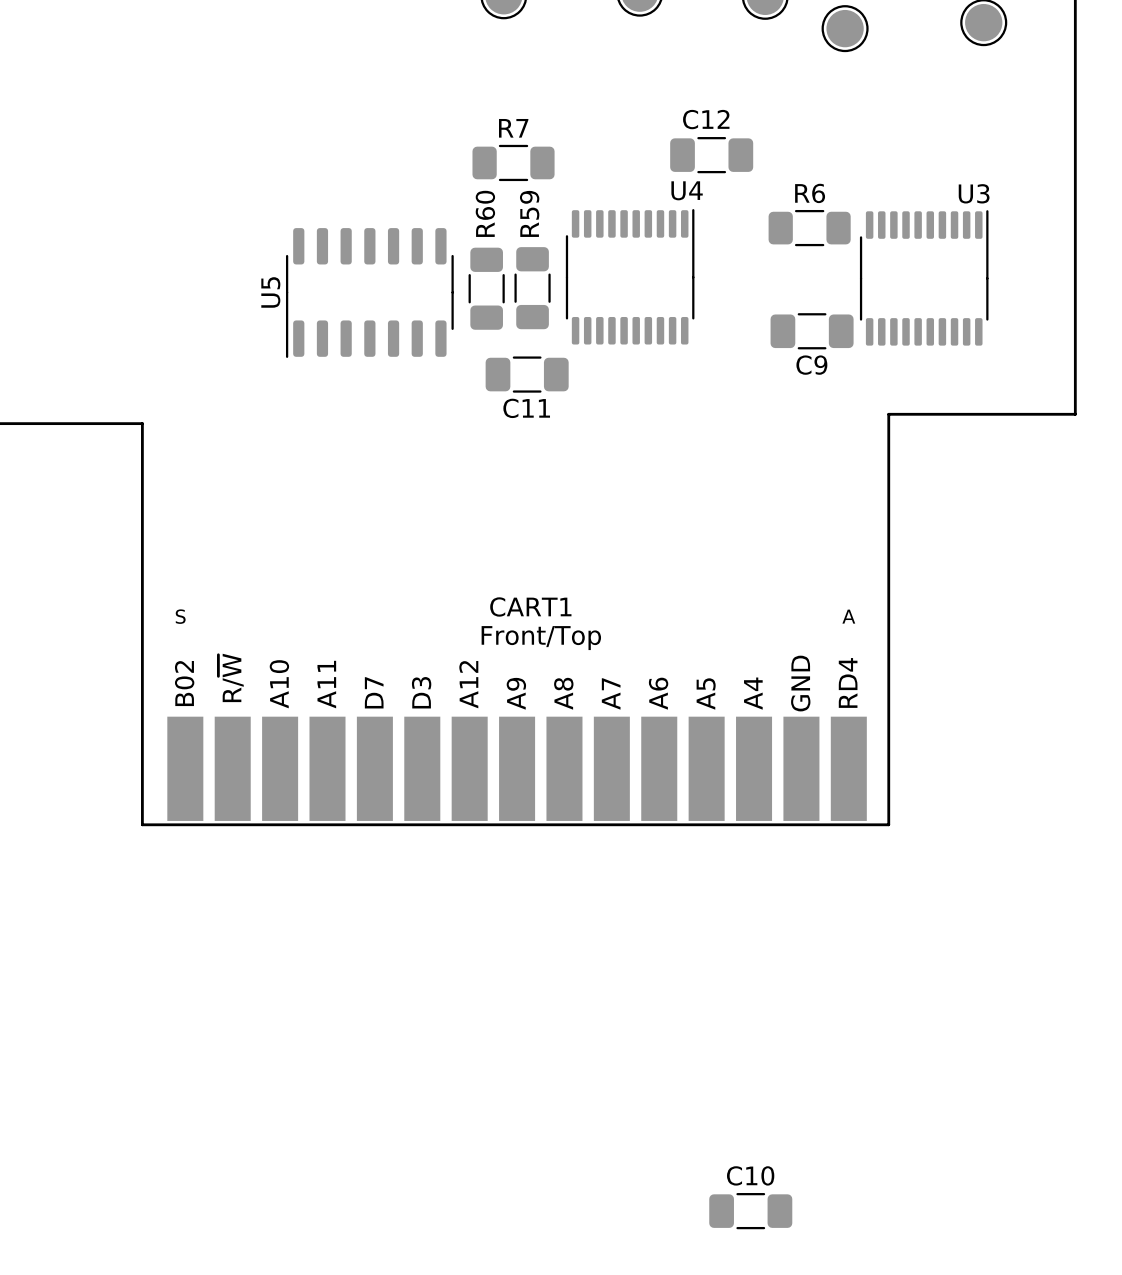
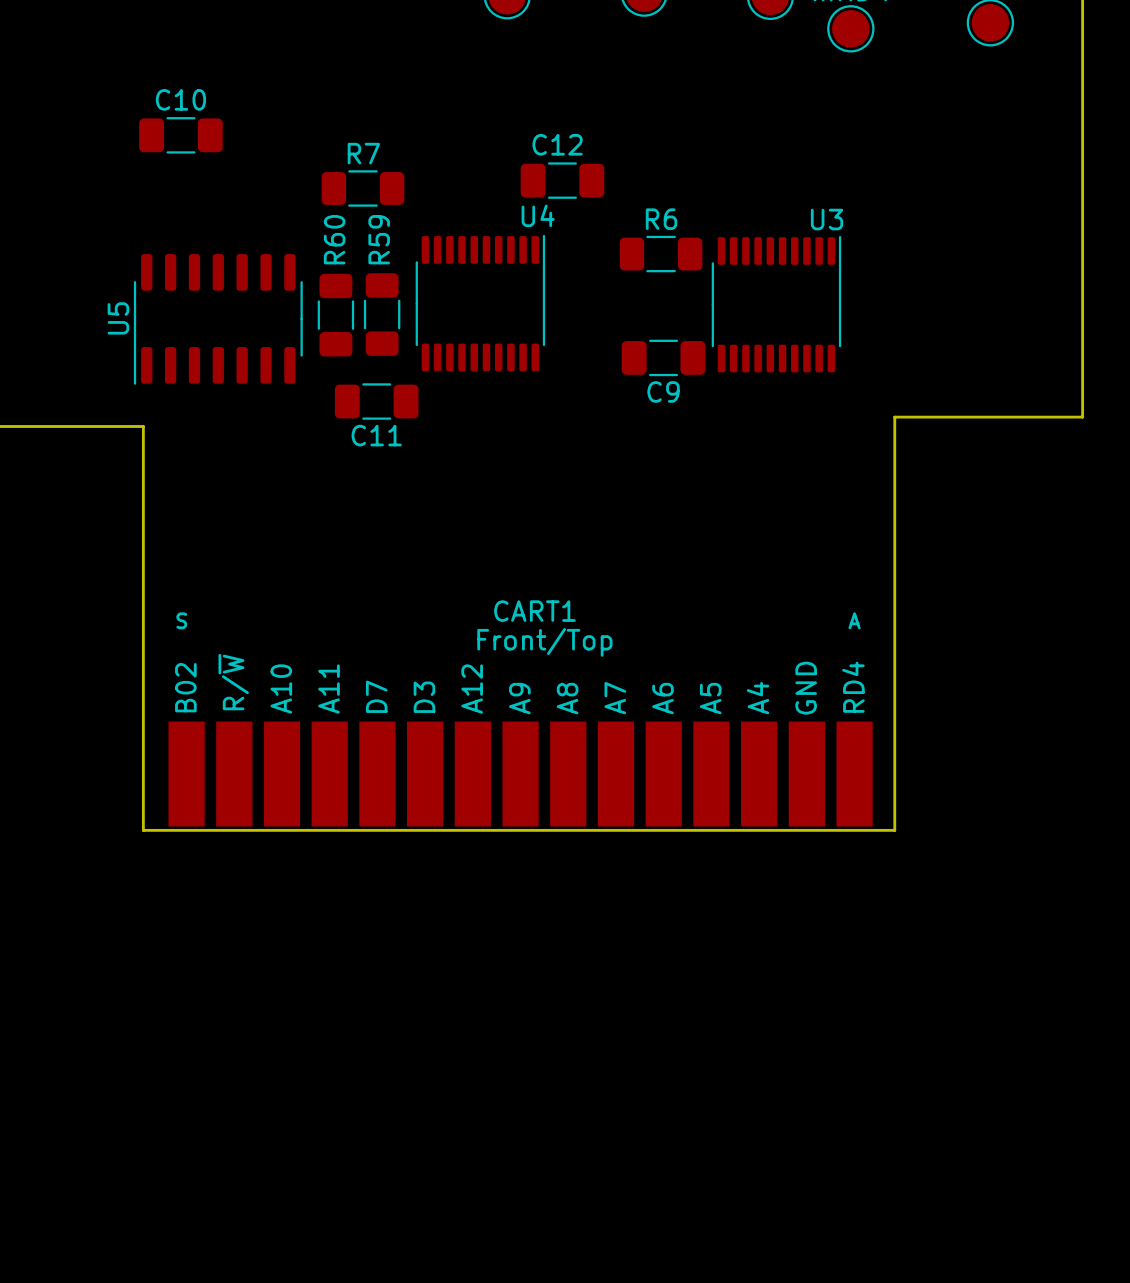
C12 position: (711, 155) -> (562, 180)
R7 position: (513, 162) -> (362, 188)
R6 position: (809, 228) -> (661, 254)
U4 position: (630, 276) -> (480, 303)
U3 position: (924, 277) -> (776, 304)
R60 position: (486, 288) -> (335, 315)
R59 position: (532, 288) -> (382, 314)
U5 position: (369, 293) -> (218, 319)
C9 position: (812, 331) -> (663, 357)
C11 position: (527, 374) -> (376, 401)
C10 position: (750, 1211) -> (180, 135)

